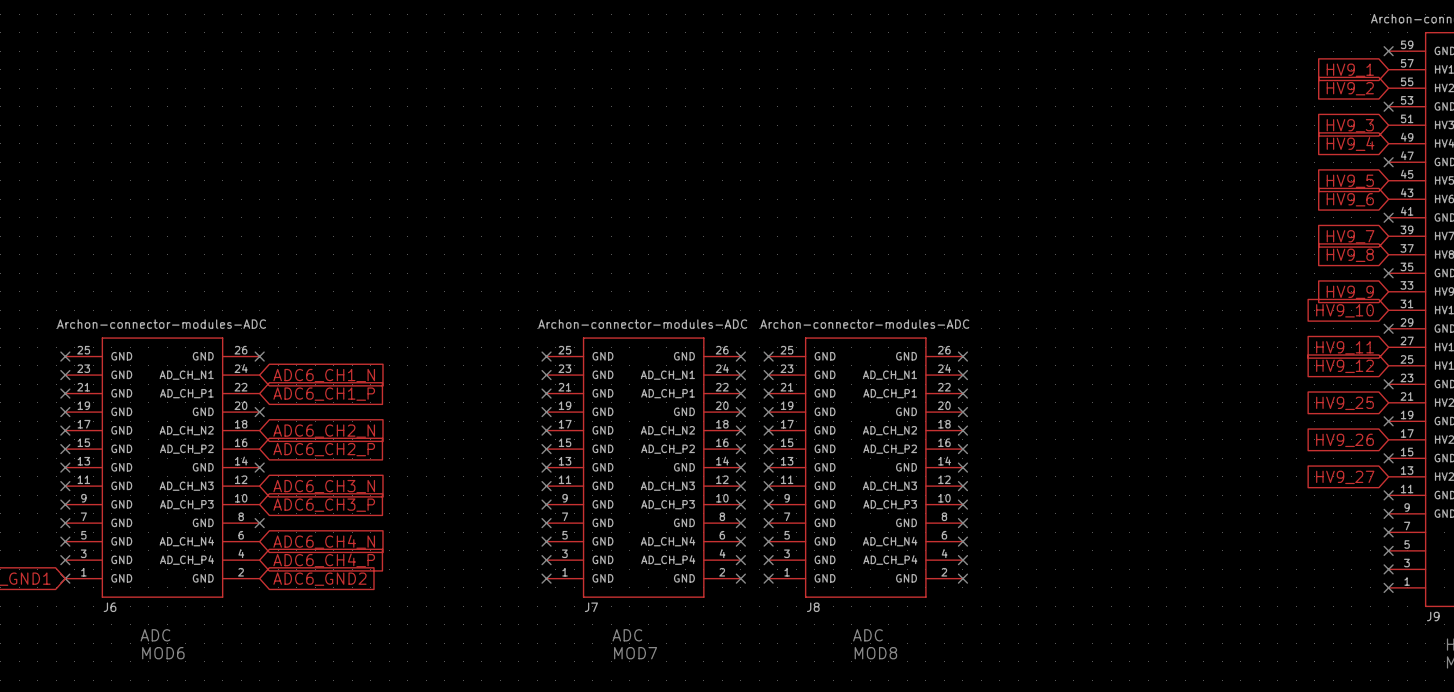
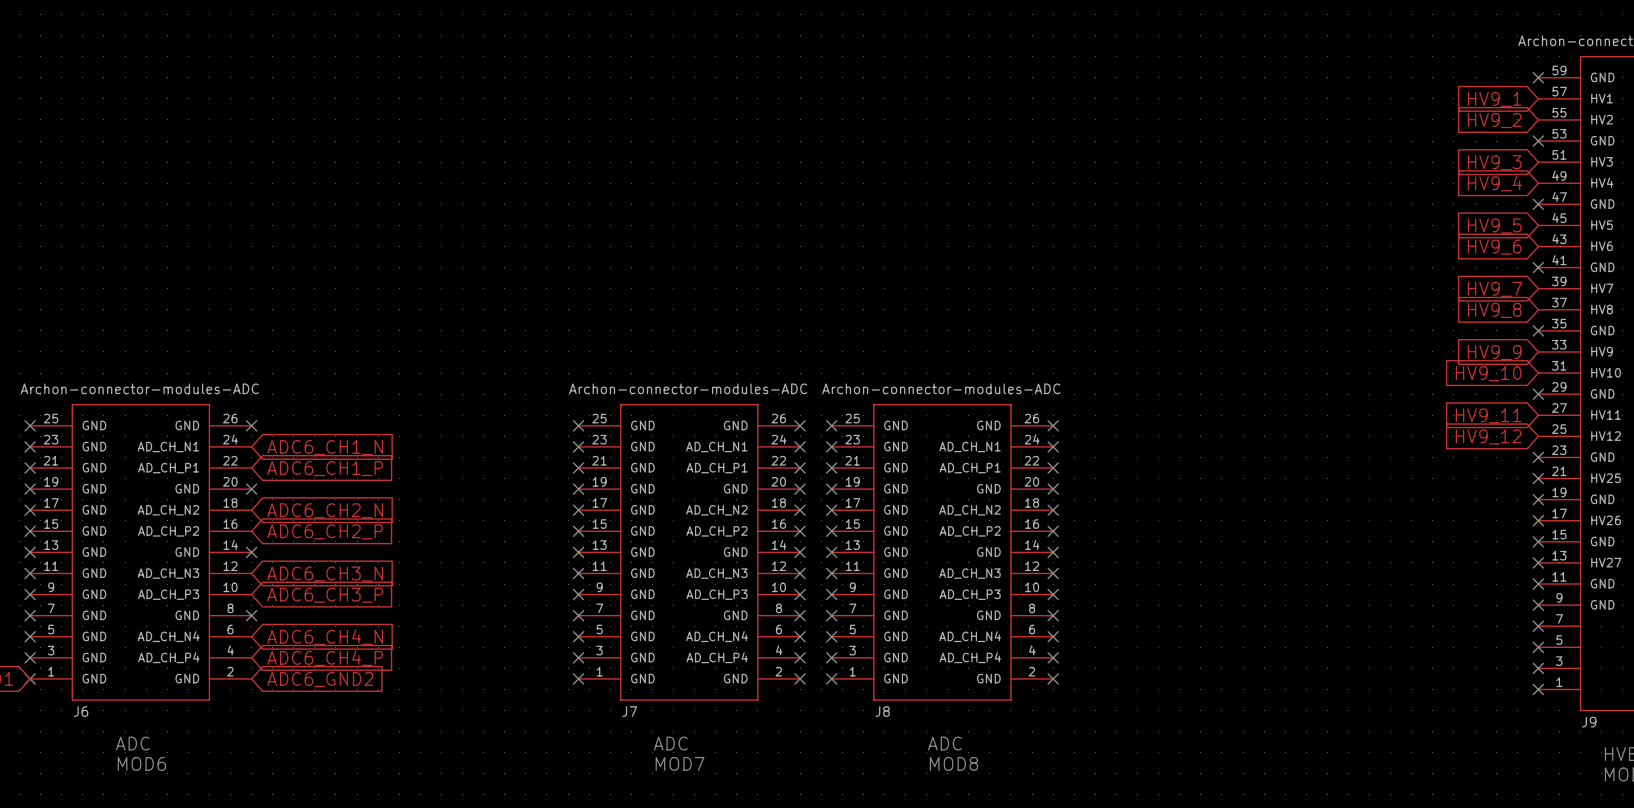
no-connect mark: none -> (1538, 478)
global label: HV9_25 (1344, 403) -> none
no-connect mark: none -> (1538, 520)
global label: HV9_26 (1344, 440) -> none
no-connect mark: none -> (1538, 562)
global label: HV9_27 (1345, 477) -> none

